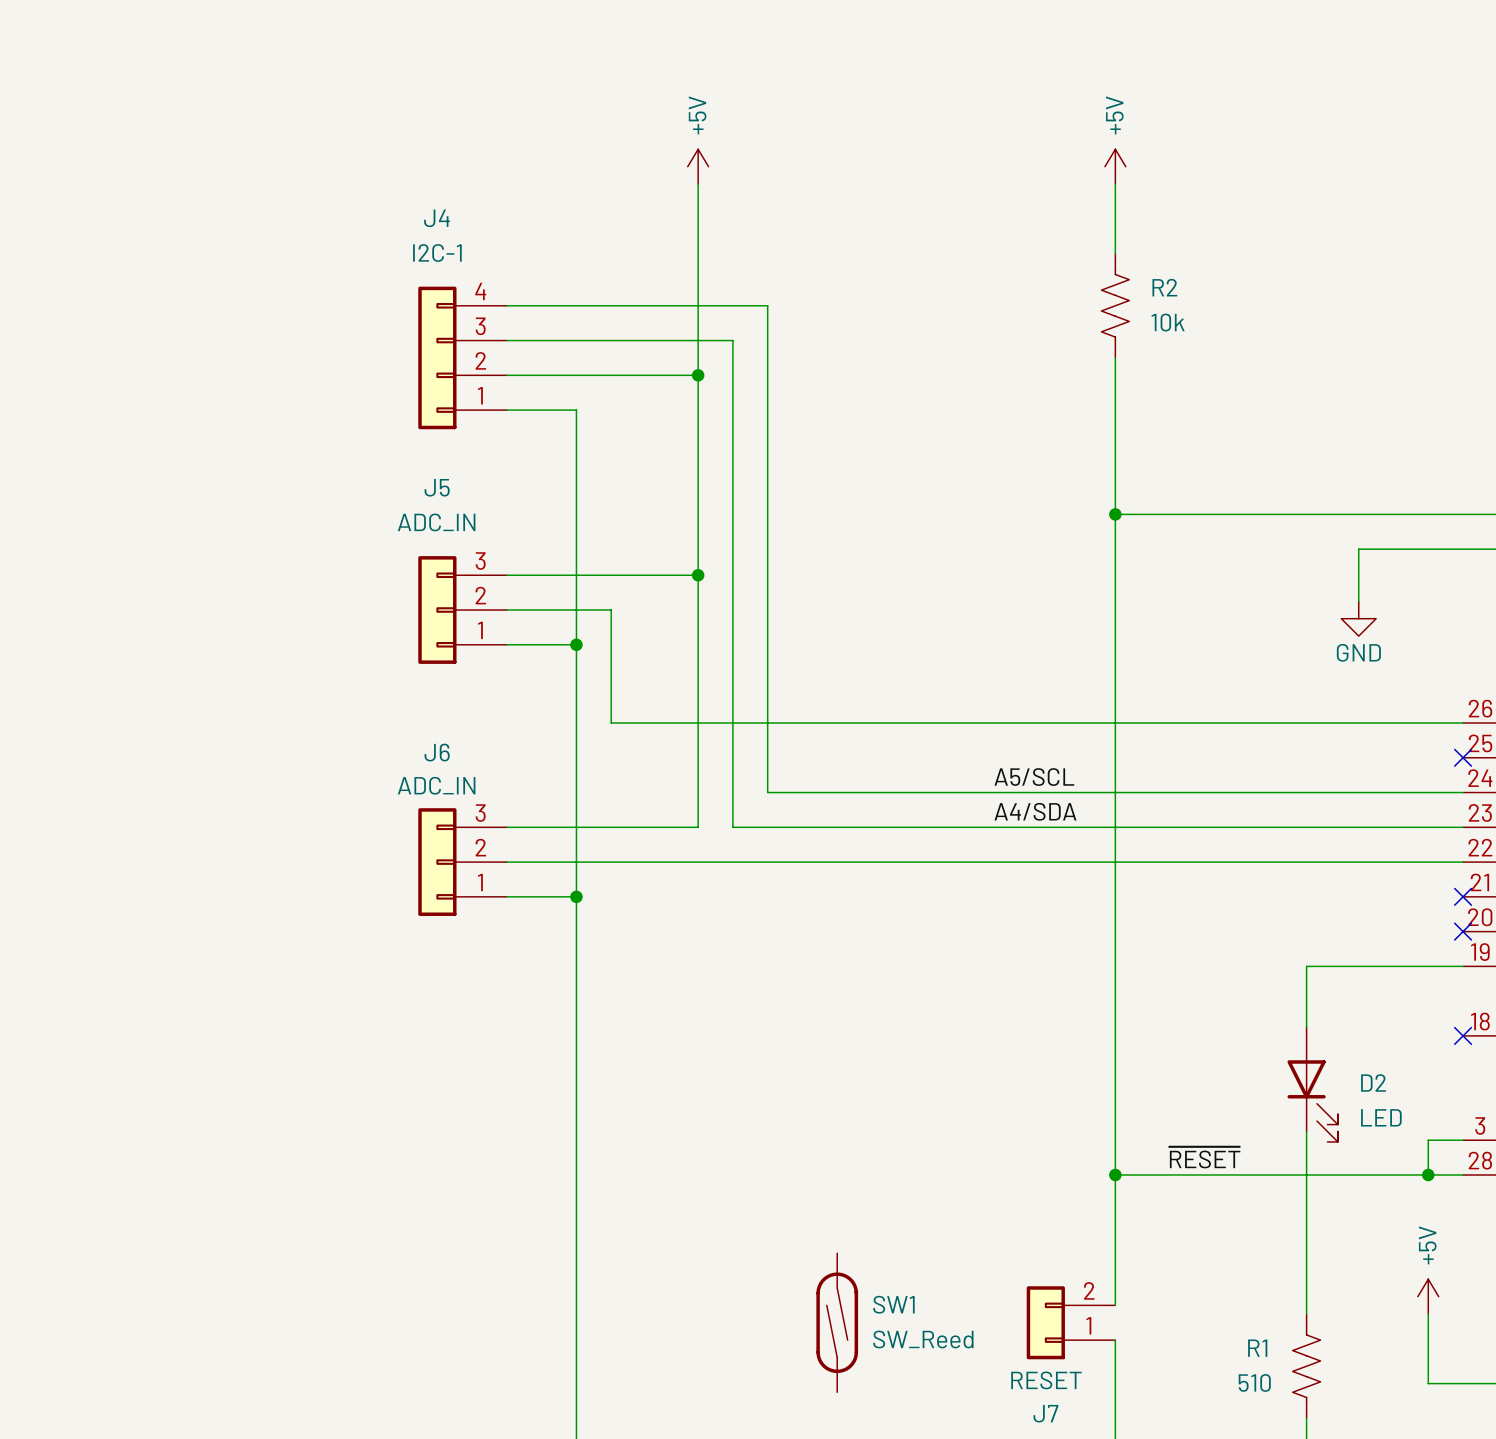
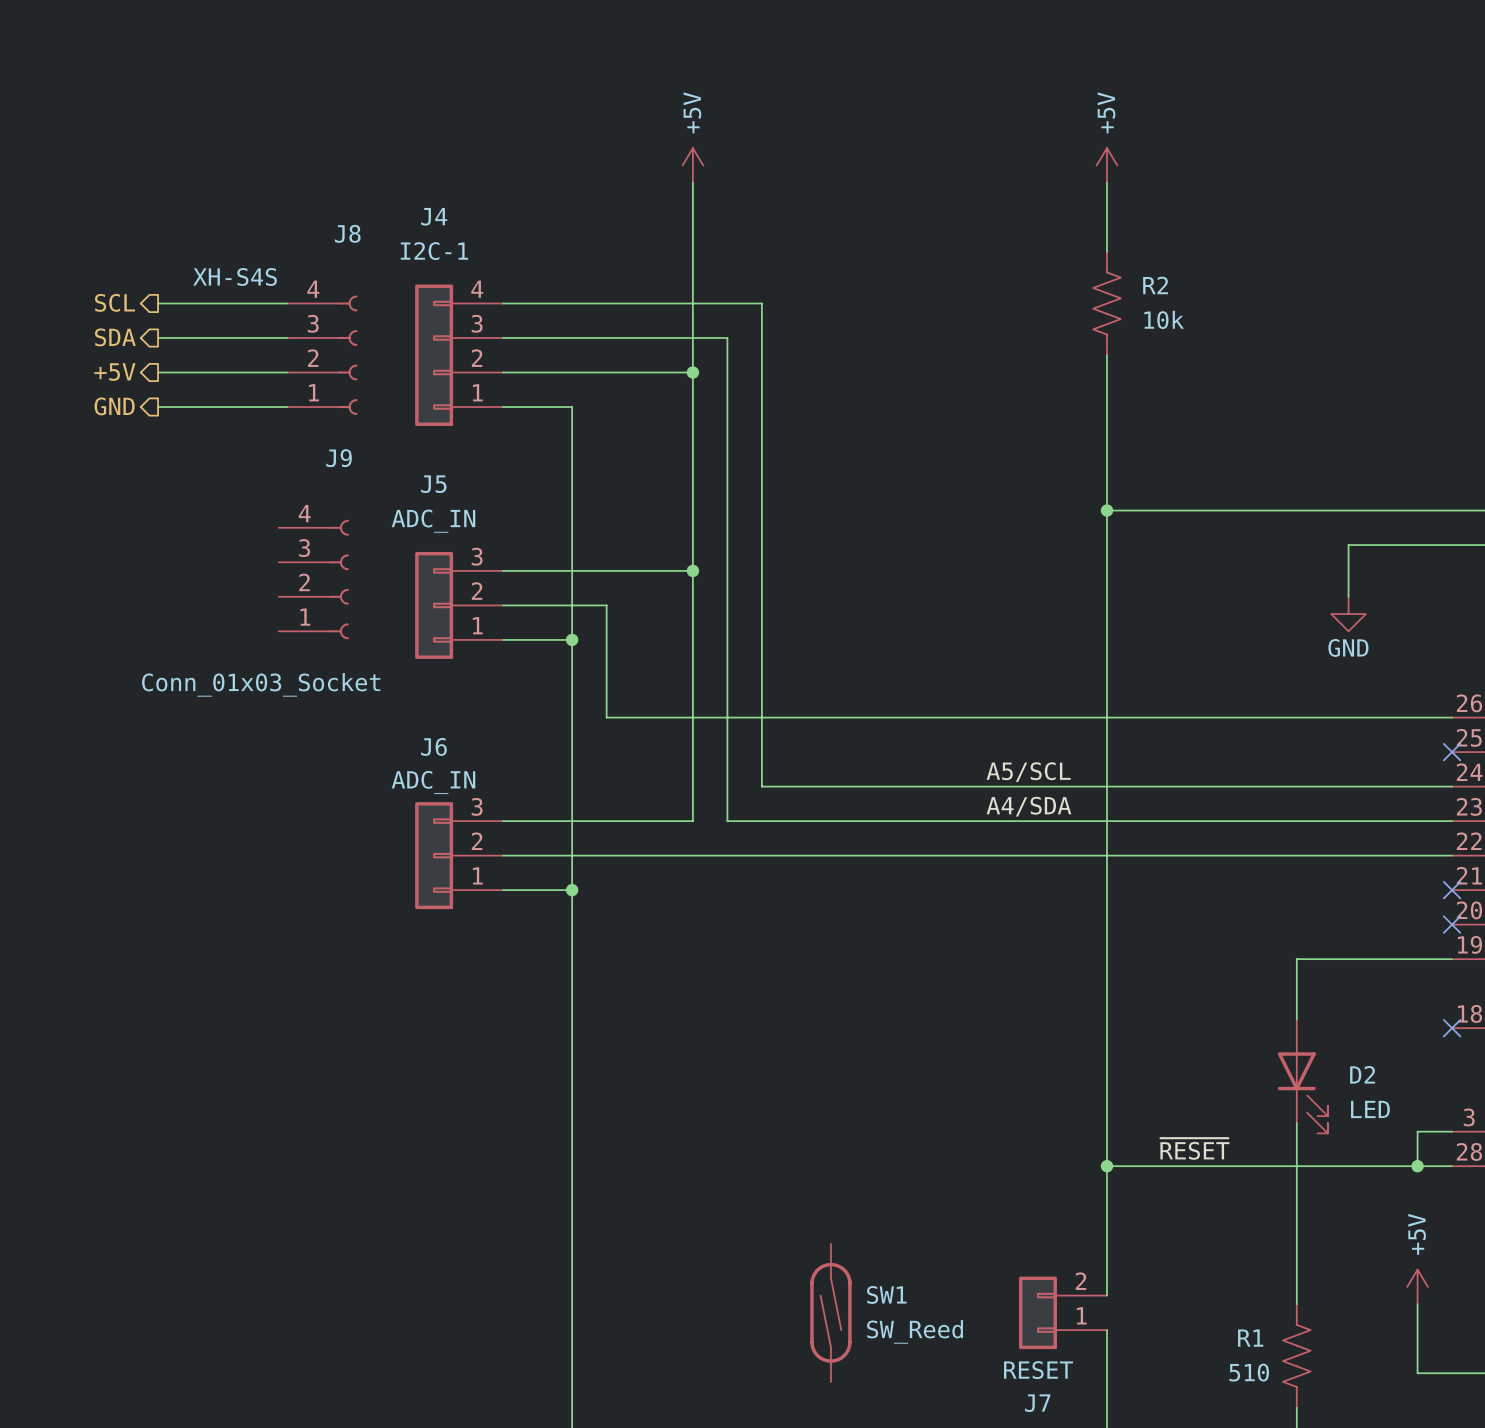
hierarchical label: none -> SCL (115, 302)
wire: none -> (158, 303) (287, 303)
hierarchical label: none -> SDA (115, 337)
wire: none -> (158, 338) (287, 338)
J8: none -> XH-S4S (322, 355)
hierarchical label: none -> +5V (114, 372)
wire: none -> (158, 372) (287, 372)
hierarchical label: none -> GND (114, 406)
wire: none -> (158, 407) (287, 407)
J9: none -> Conn_01x03_Socket (313, 579)

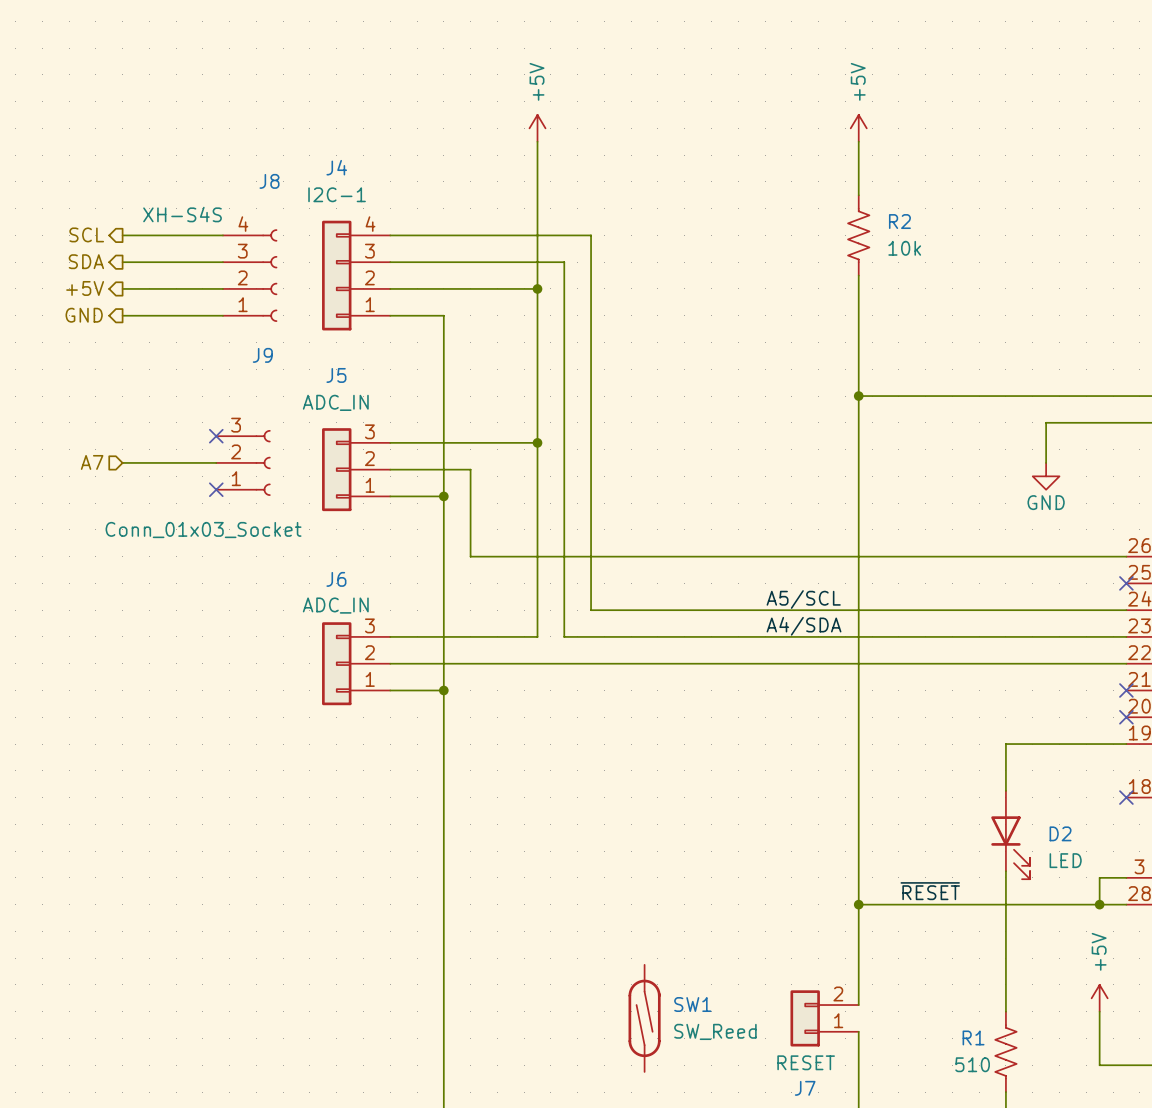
J9 symbol: [278, 519, 349, 640] -> [216, 430, 271, 496]
no-connect mark: none -> (216, 436)
hierarchical label: none -> A7 (92, 462)
wire: none -> (122, 462) (216, 462)
no-connect mark: none -> (216, 489)

